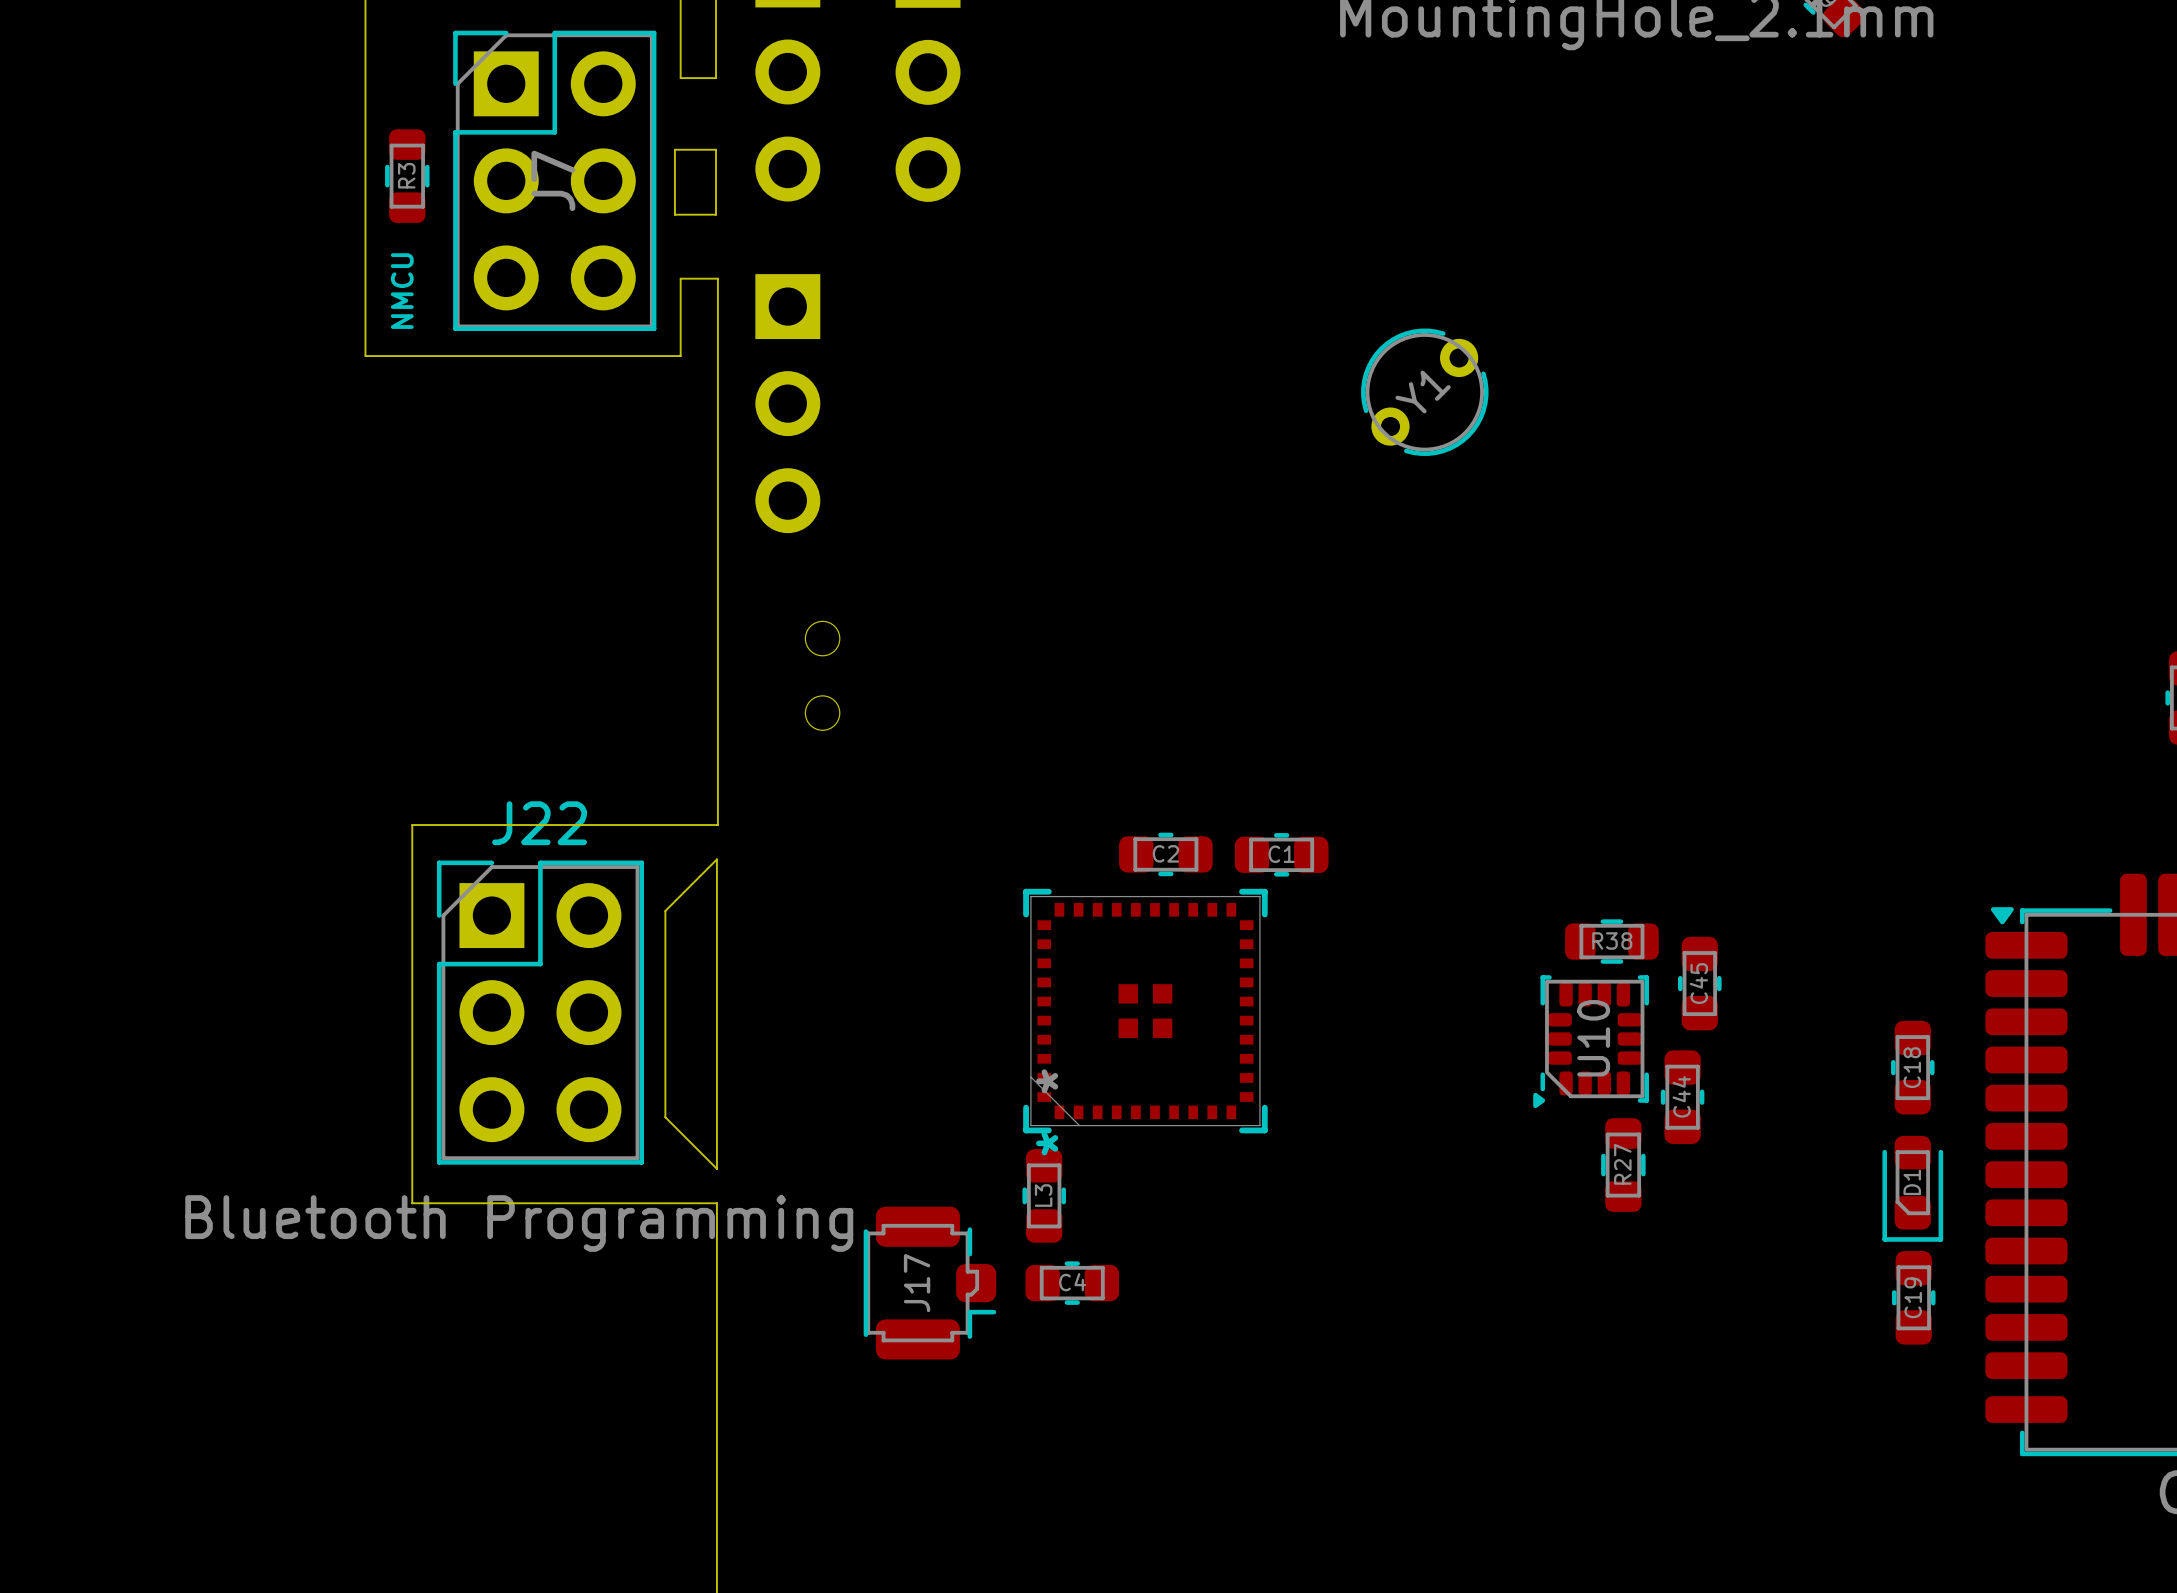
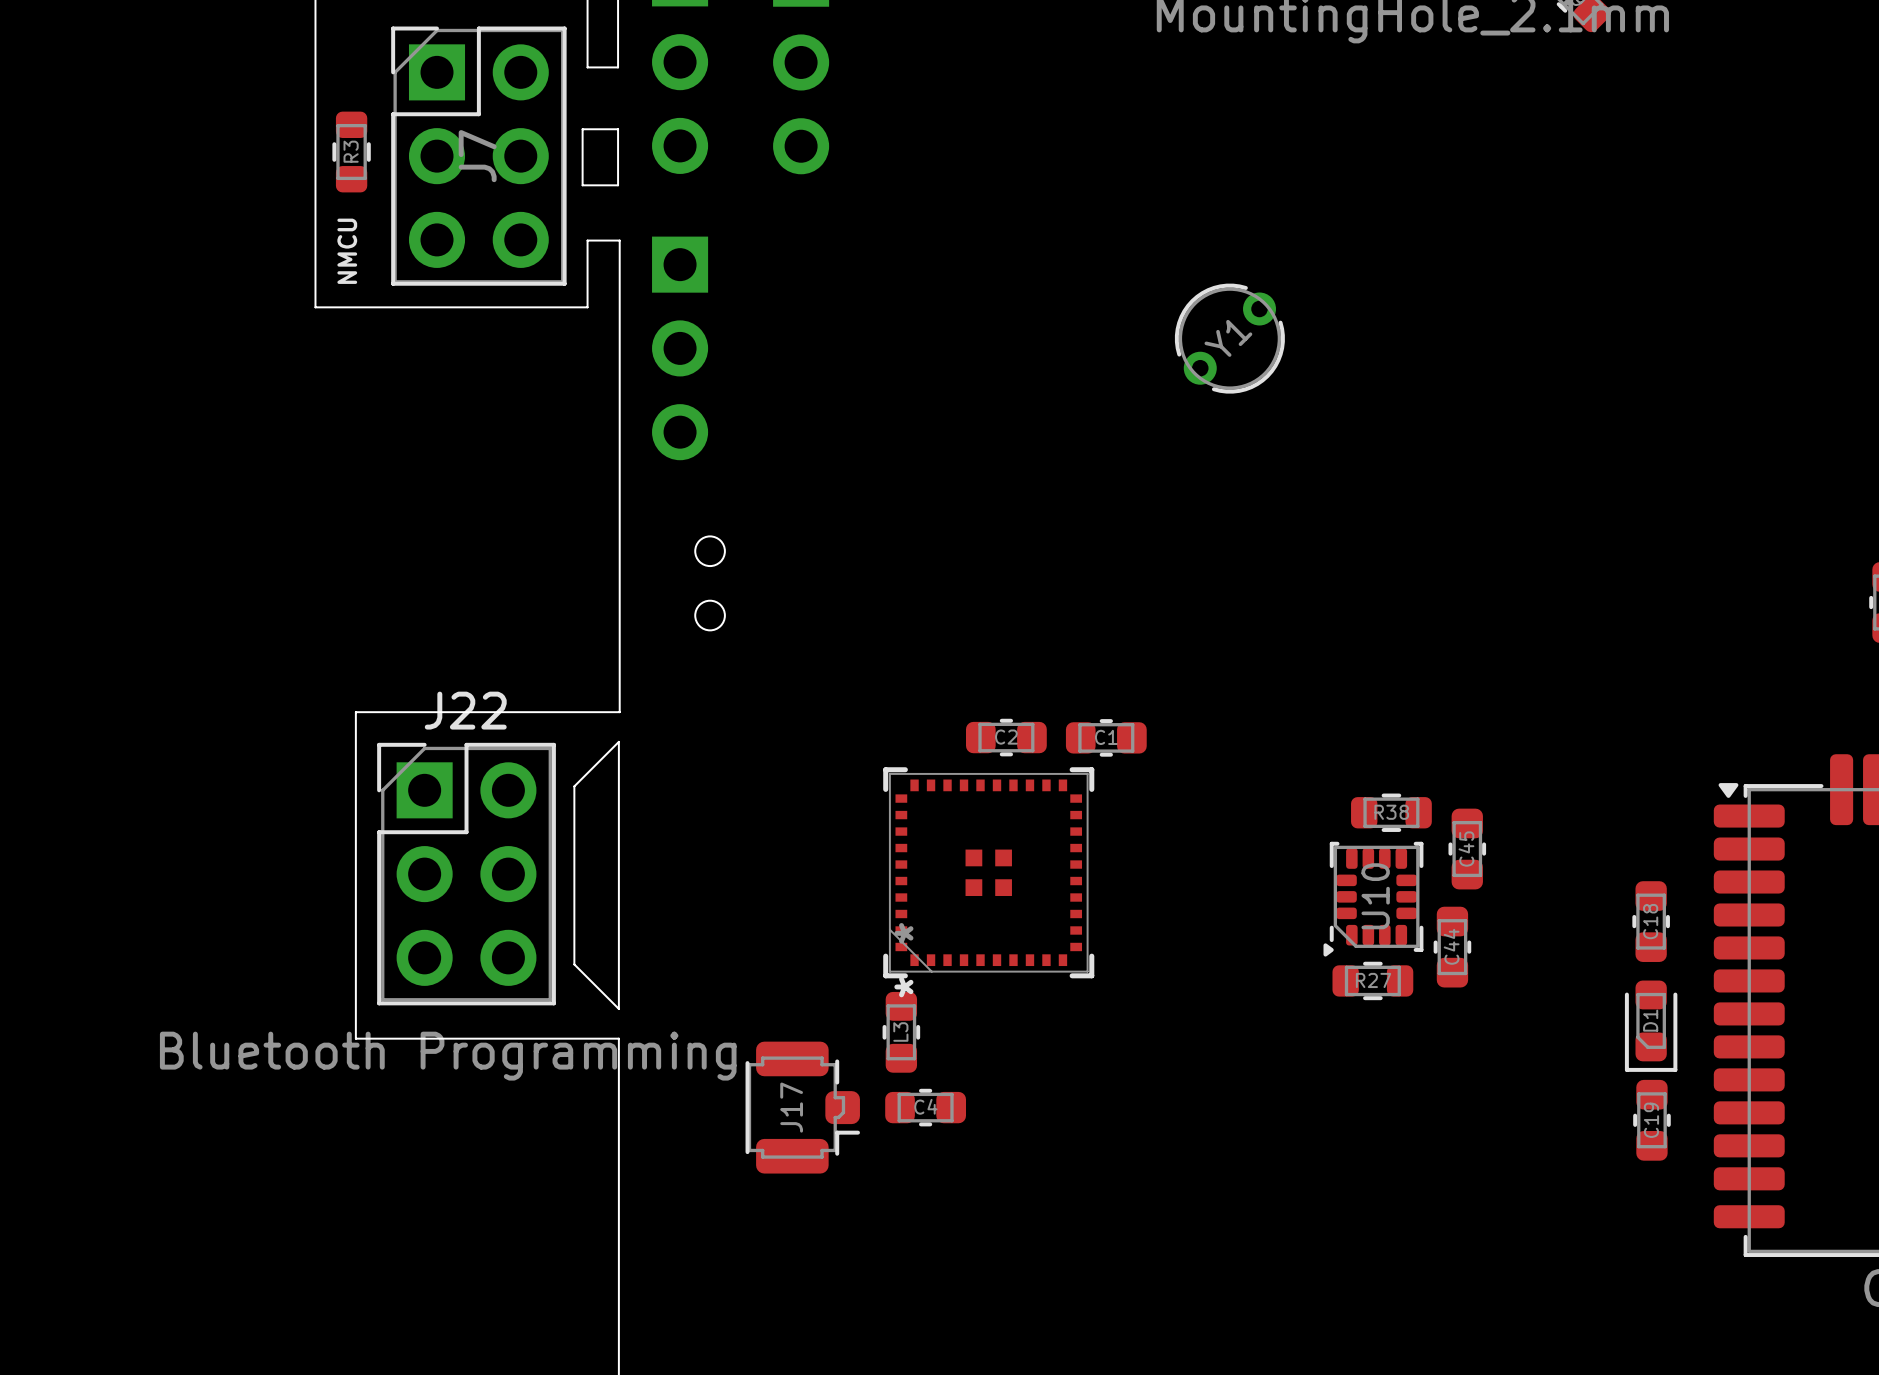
R27 rotation: 0° (1623, 1165) -> 90° clockwise (1372, 980)

